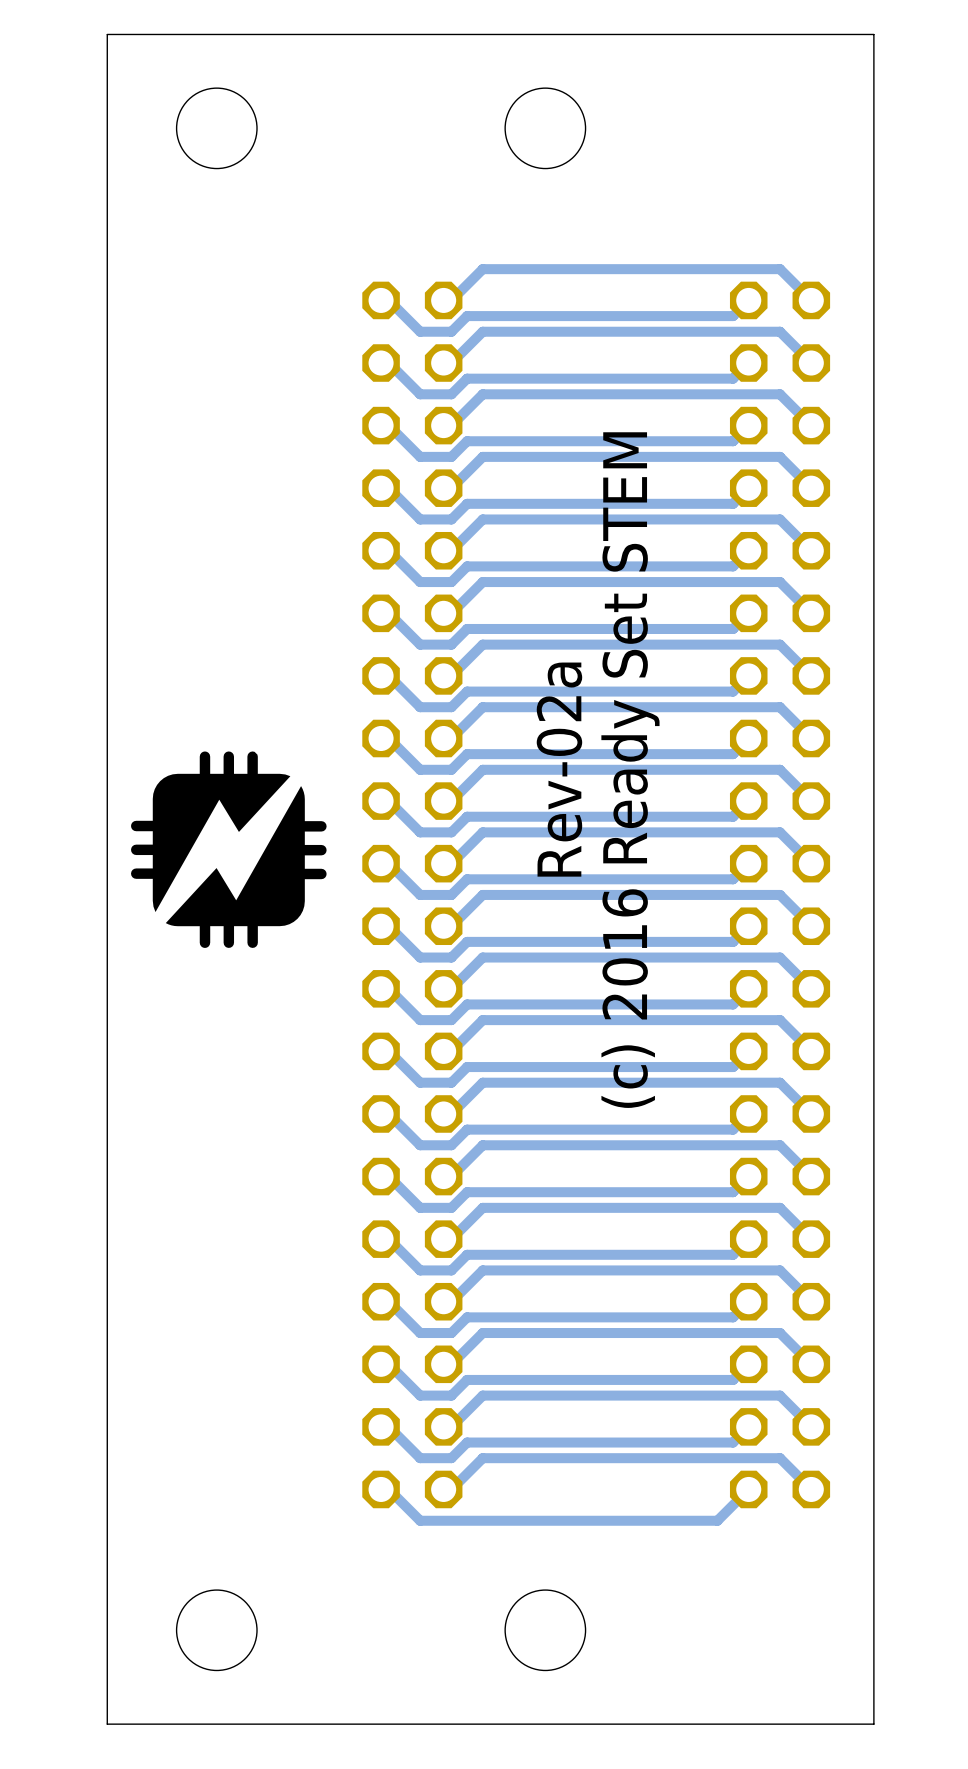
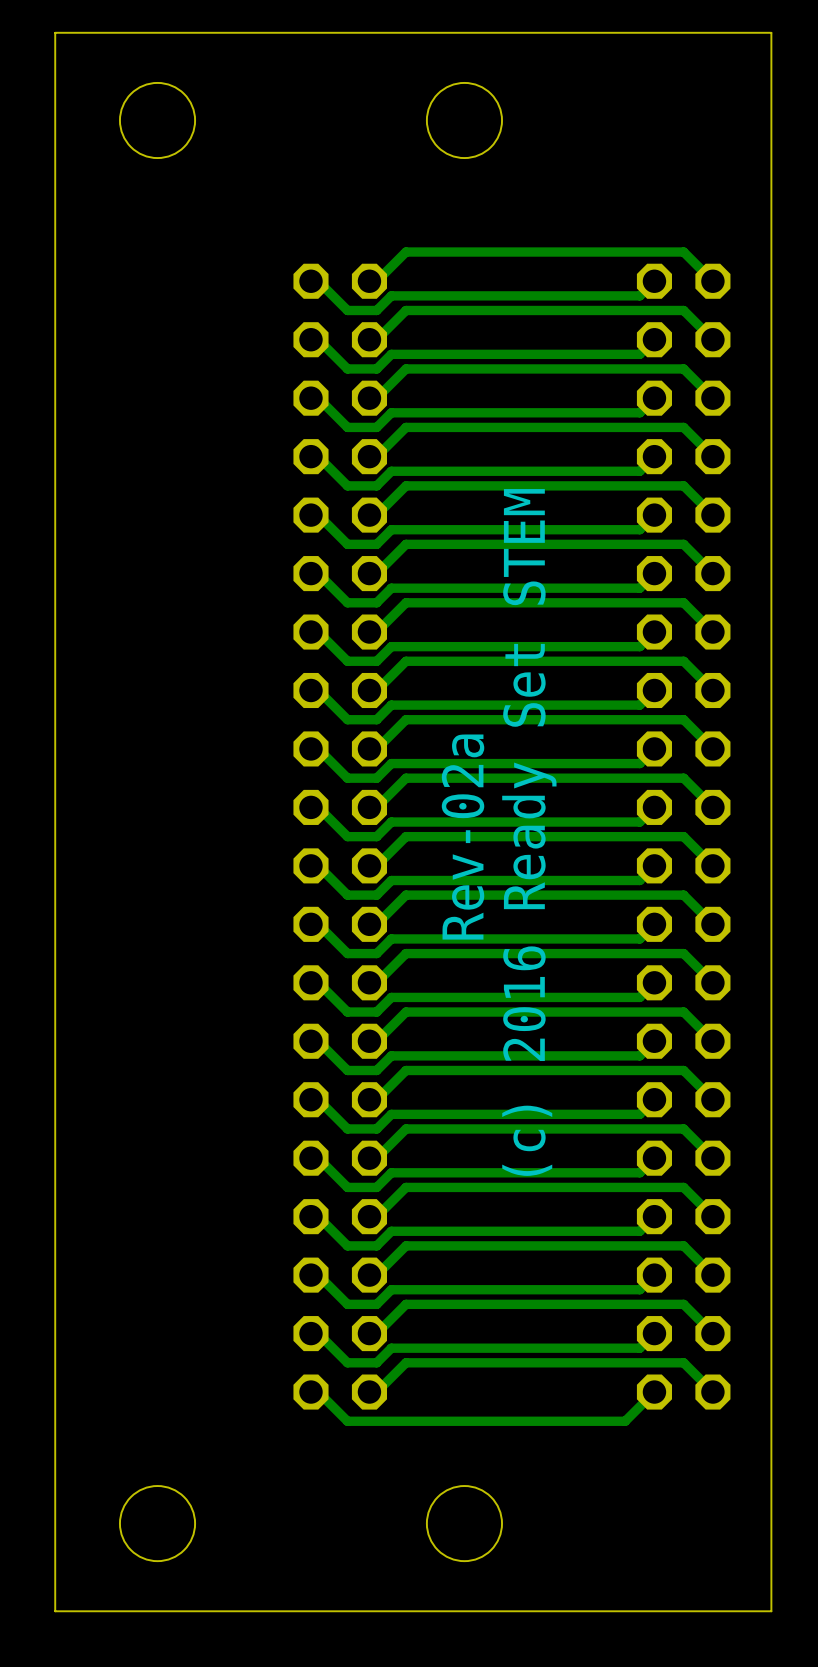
drawing: [131, 751, 327, 948] -> none
text position: Rev-02a (559, 769) -> Rev-02a (463, 837)
text position: (c) 2016 Ready Set STEM (630, 770) -> (c) 2016 Ready Set STEM (529, 832)

